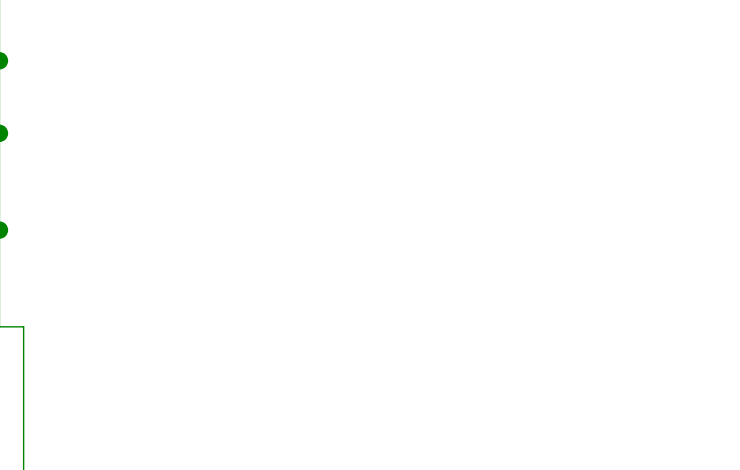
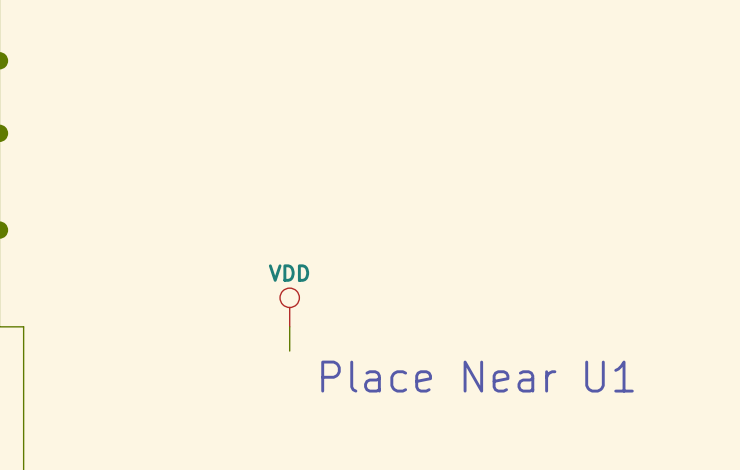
power symbol: none -> VDD (289, 307)
wire: none -> (289, 326) (289, 351)
text: none -> Place Near U1 (477, 376)

